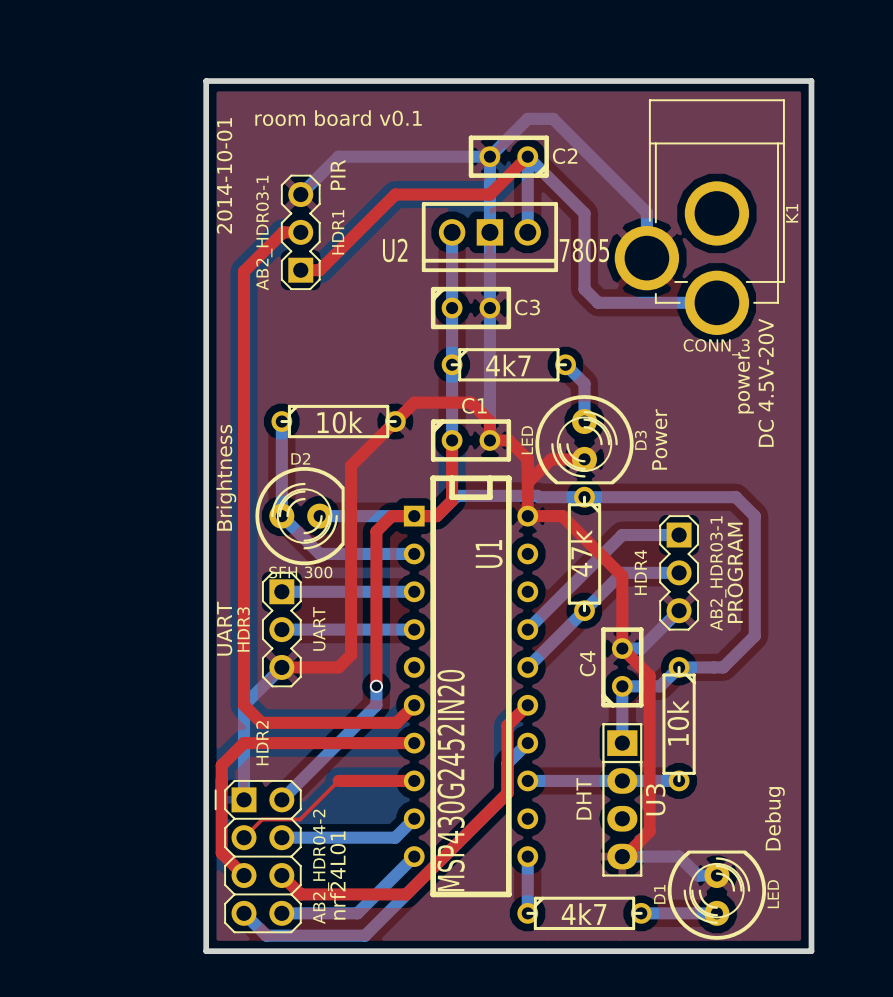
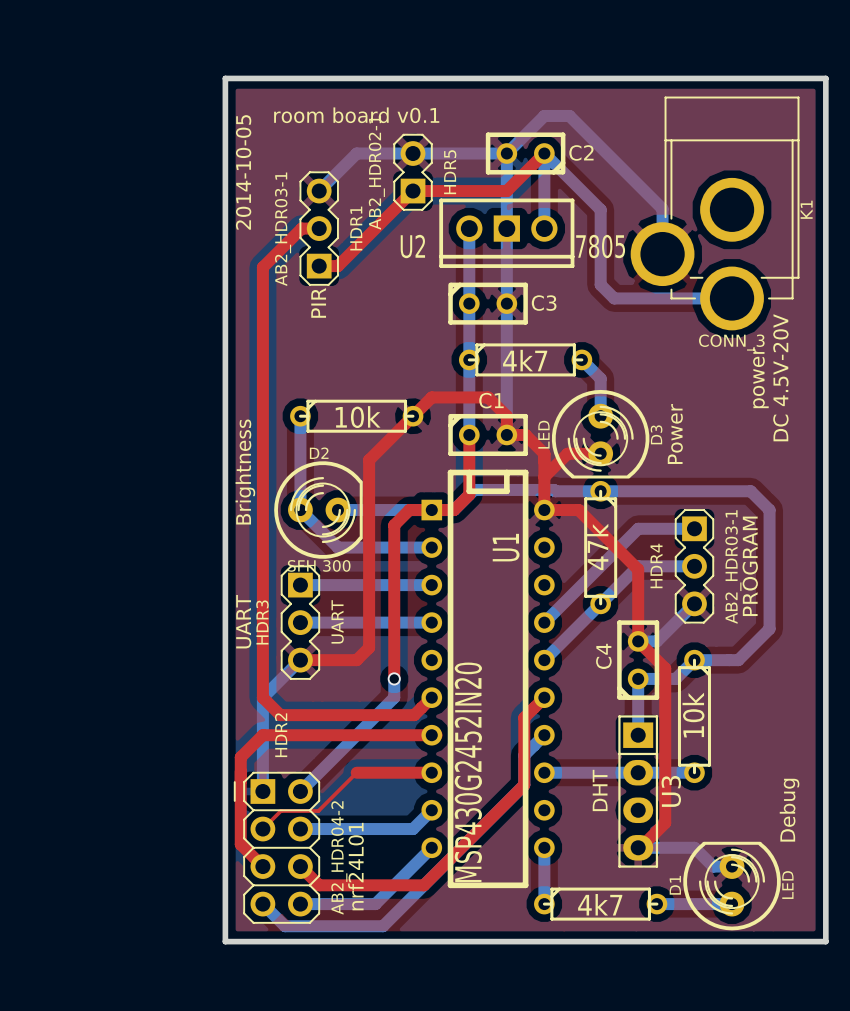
text position: PIR (338, 174) -> PIR (318, 302)
text: 2014-10-01 (224, 175) -> 2014-10-05 (243, 172)
HDR5: none -> AB2_HDR02-1 (413, 172)

